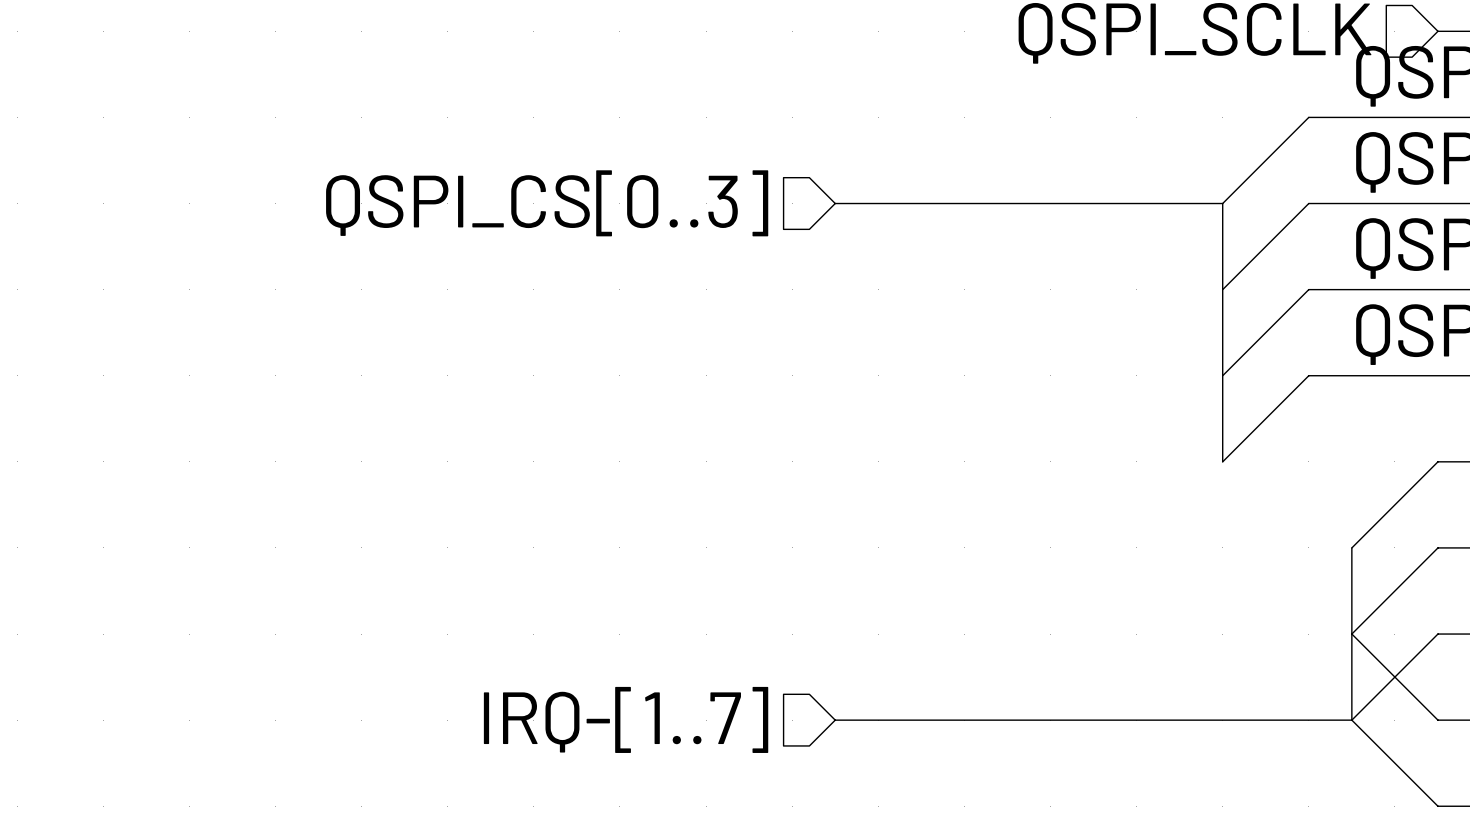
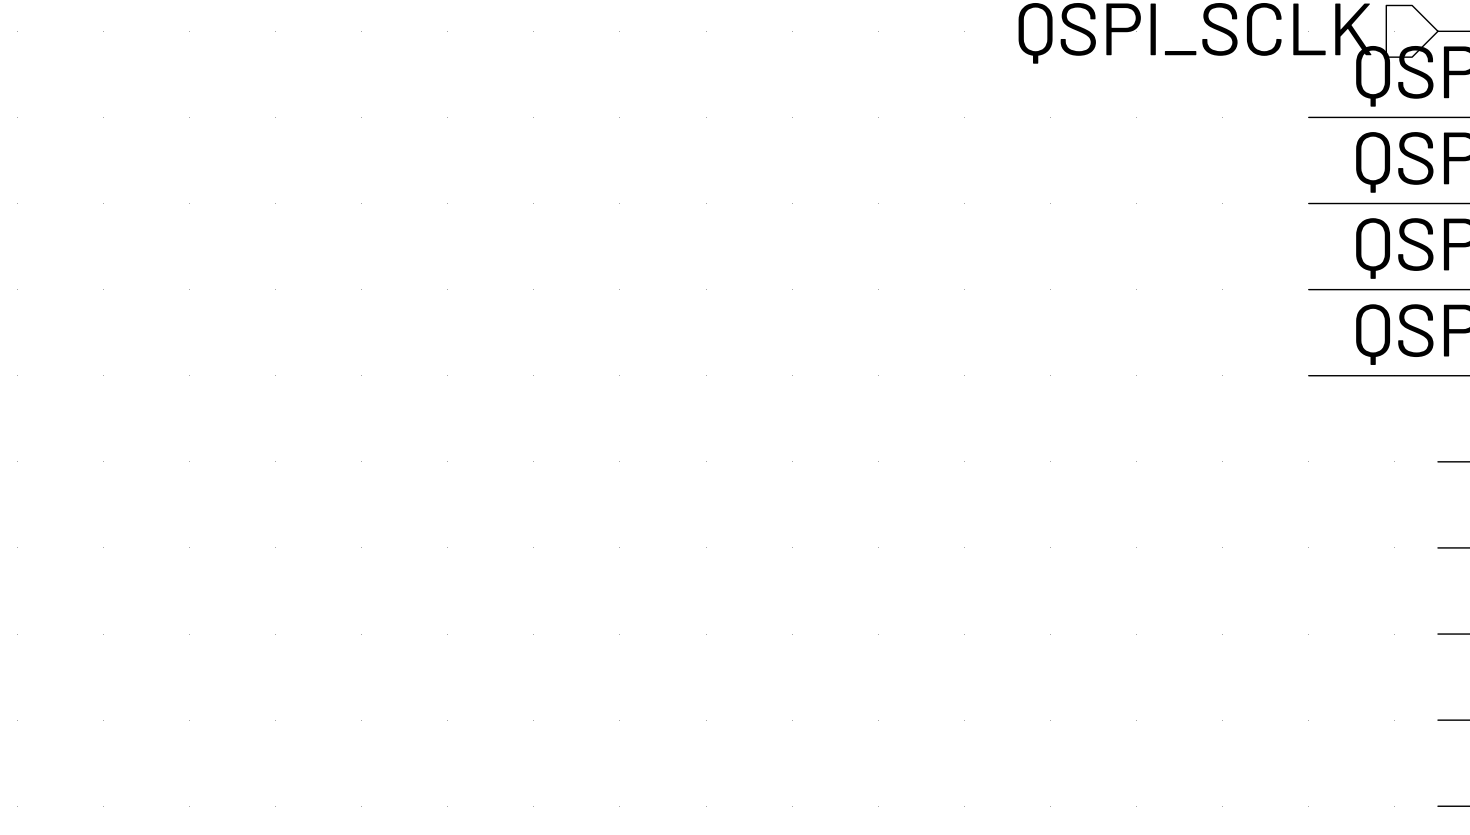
wire: (1308, 117) (1222, 203) -> none
hierarchical label: QSPI_CS[0..3] (547, 203) -> none
bus: (835, 203) (1222, 203) (1222, 461) -> none
wire: (1308, 203) (1222, 289) -> none
wire: (1308, 289) (1222, 375) -> none
wire: (1308, 375) (1222, 461) -> none
wire: (1437, 461) (1351, 547) -> none
bus: (1351, 547) (1351, 720) (835, 720) -> none
wire: (1437, 547) (1351, 634) (1437, 720) -> none
wire: (1437, 634) (1351, 720) (1437, 806) -> none
hierarchical label: IRQ-[1..7] (626, 719) -> none

